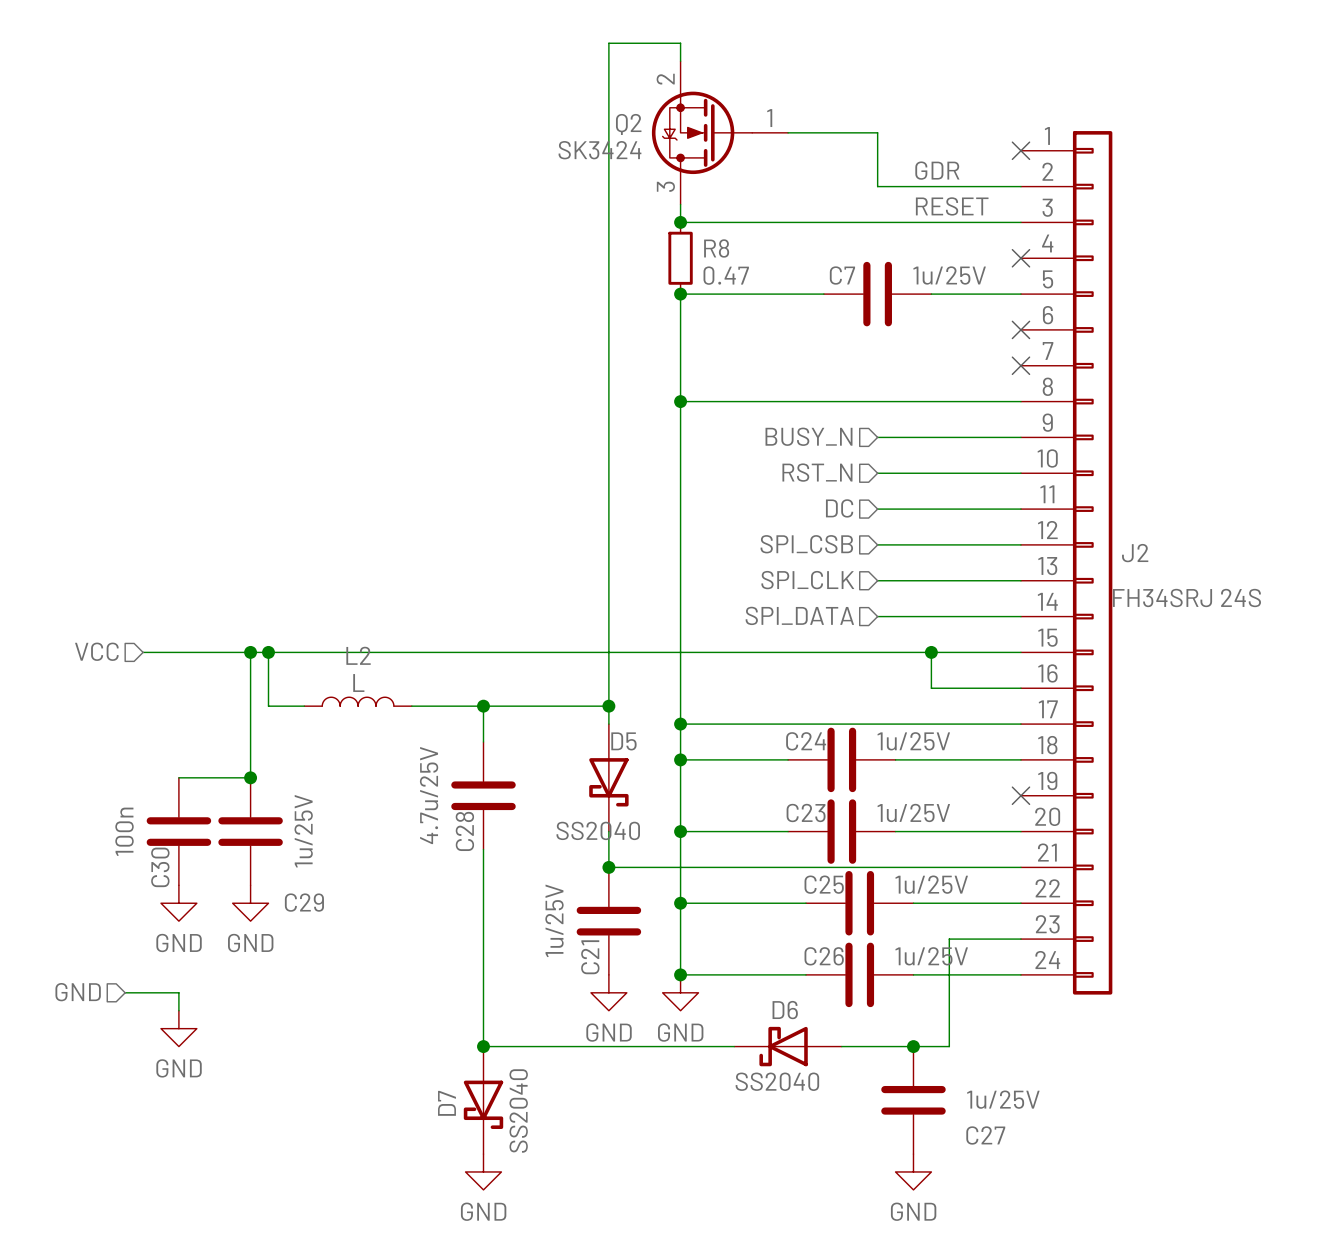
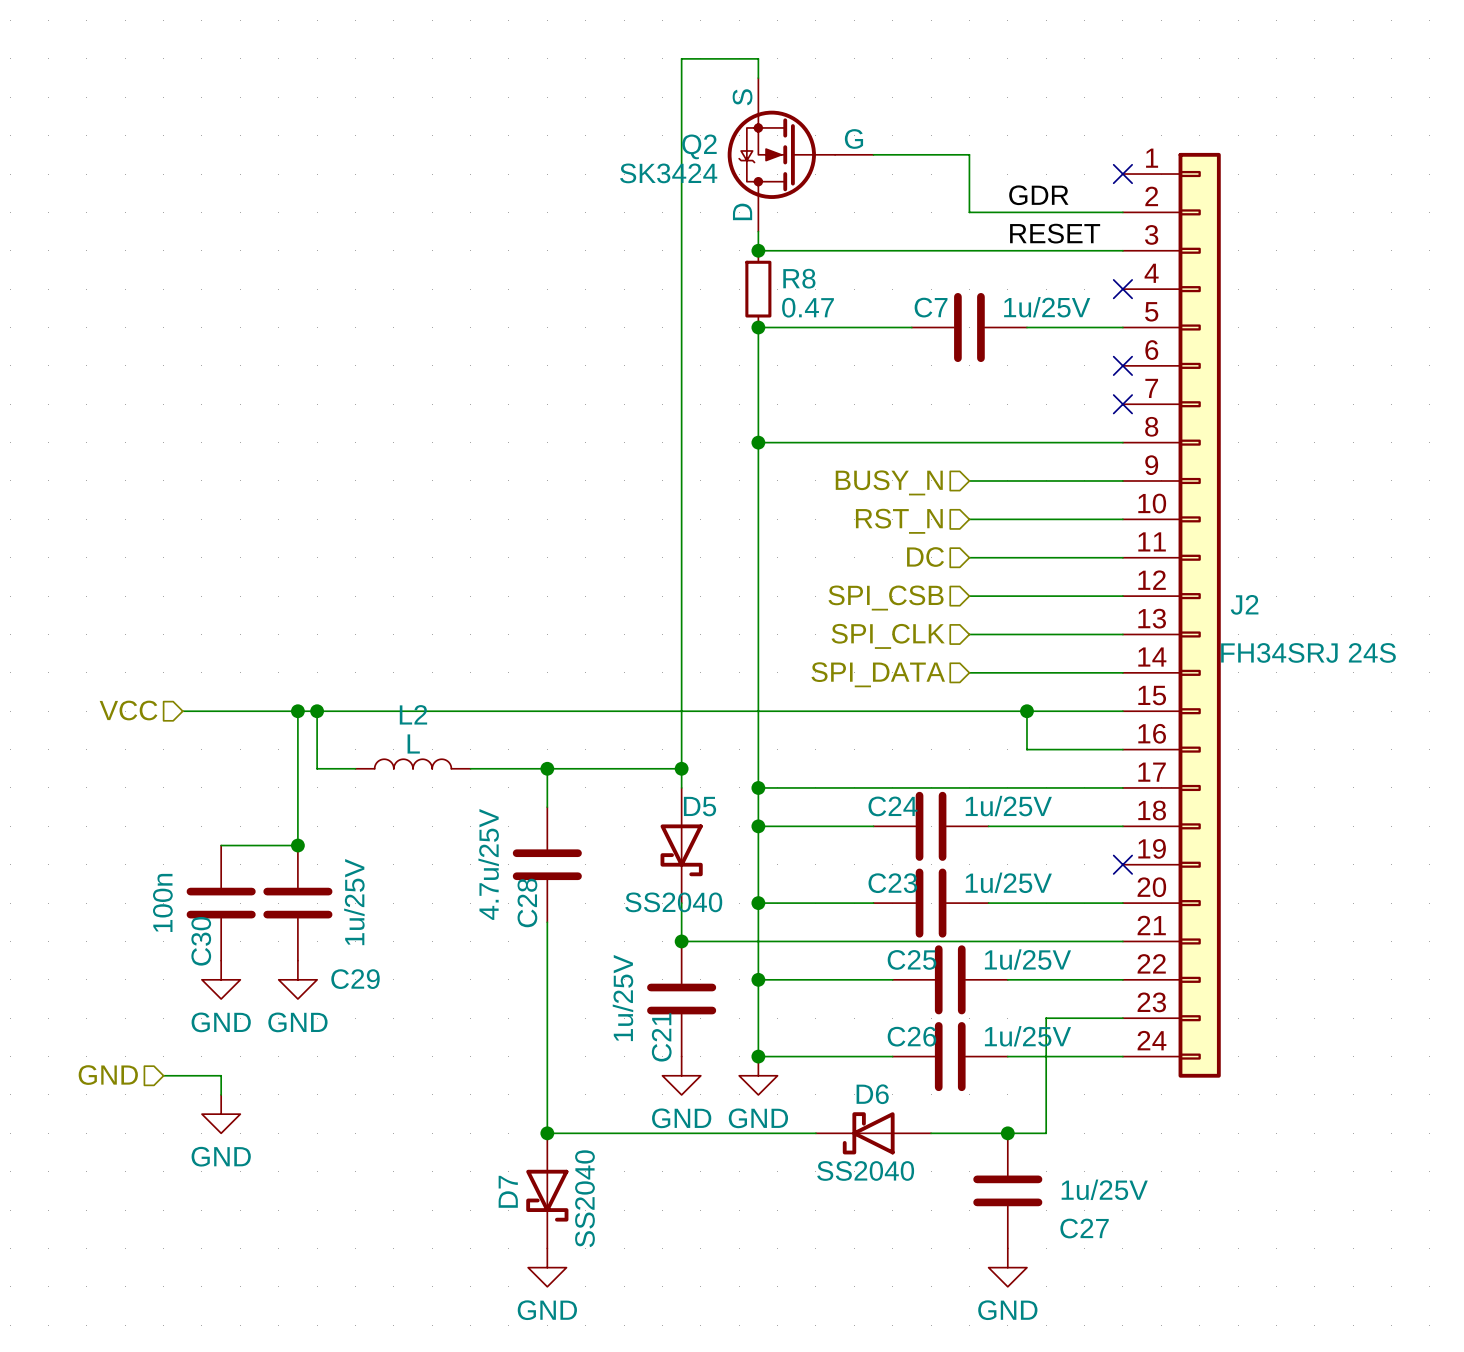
Q2 pin name: none -> S (742, 97)
Q2 pin number: 2 (665, 79) -> none
Q2 pin number: 1 (769, 118) -> none
Q2 pin name: none -> G (853, 138)
Q2 pin name: none -> D (742, 211)
Q2 pin number: 3 (665, 186) -> none

